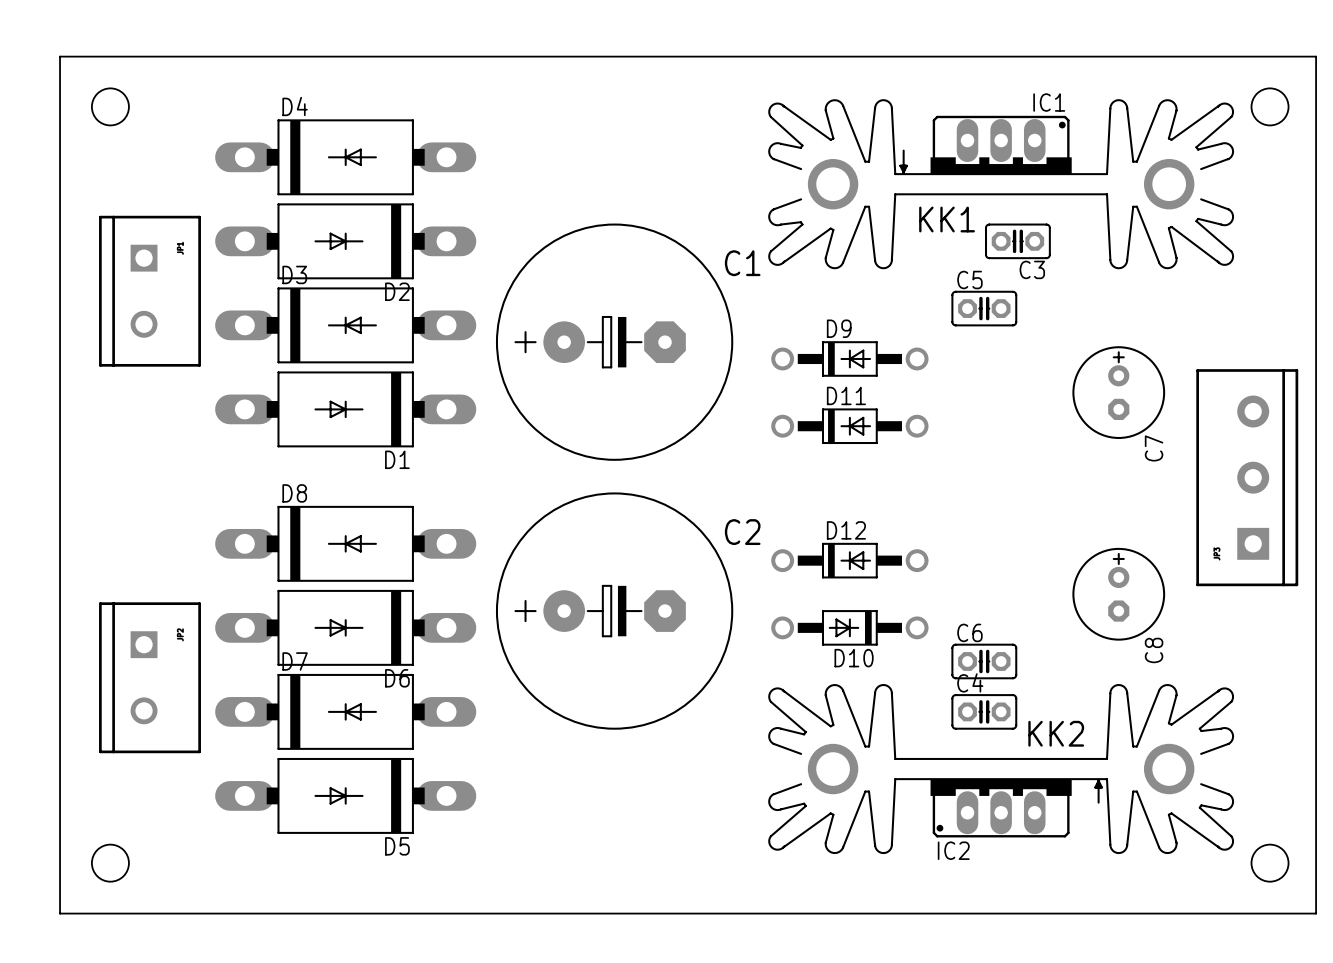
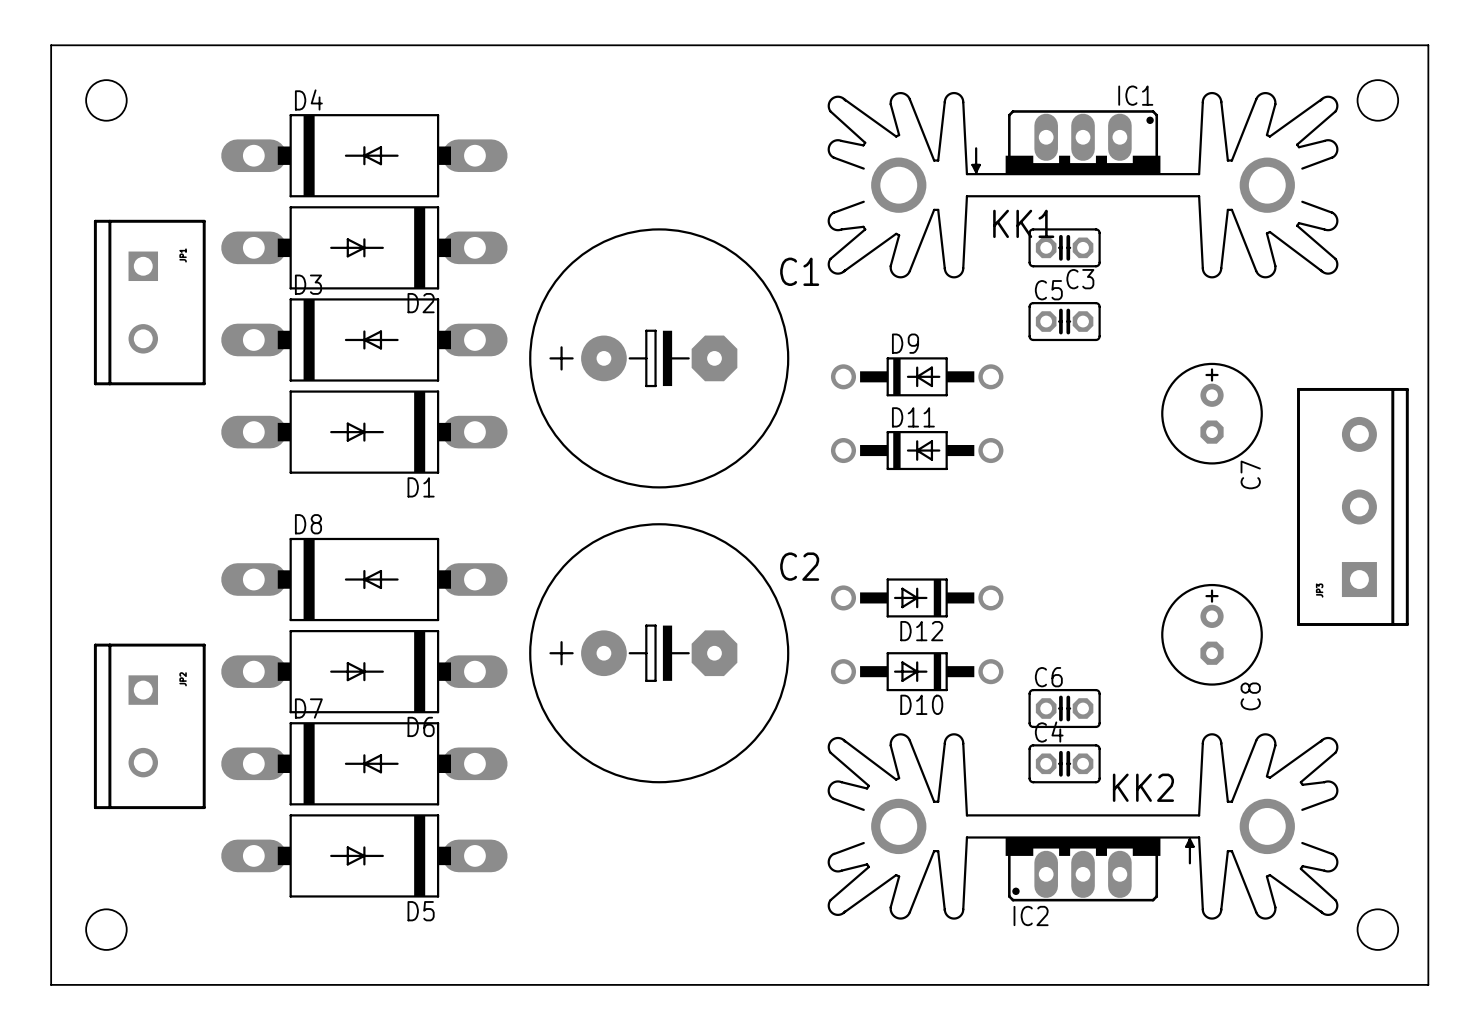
C3 position: (1017, 241) -> (1064, 247)
D12 rotation: 0° (849, 560) -> 180° (917, 597)

